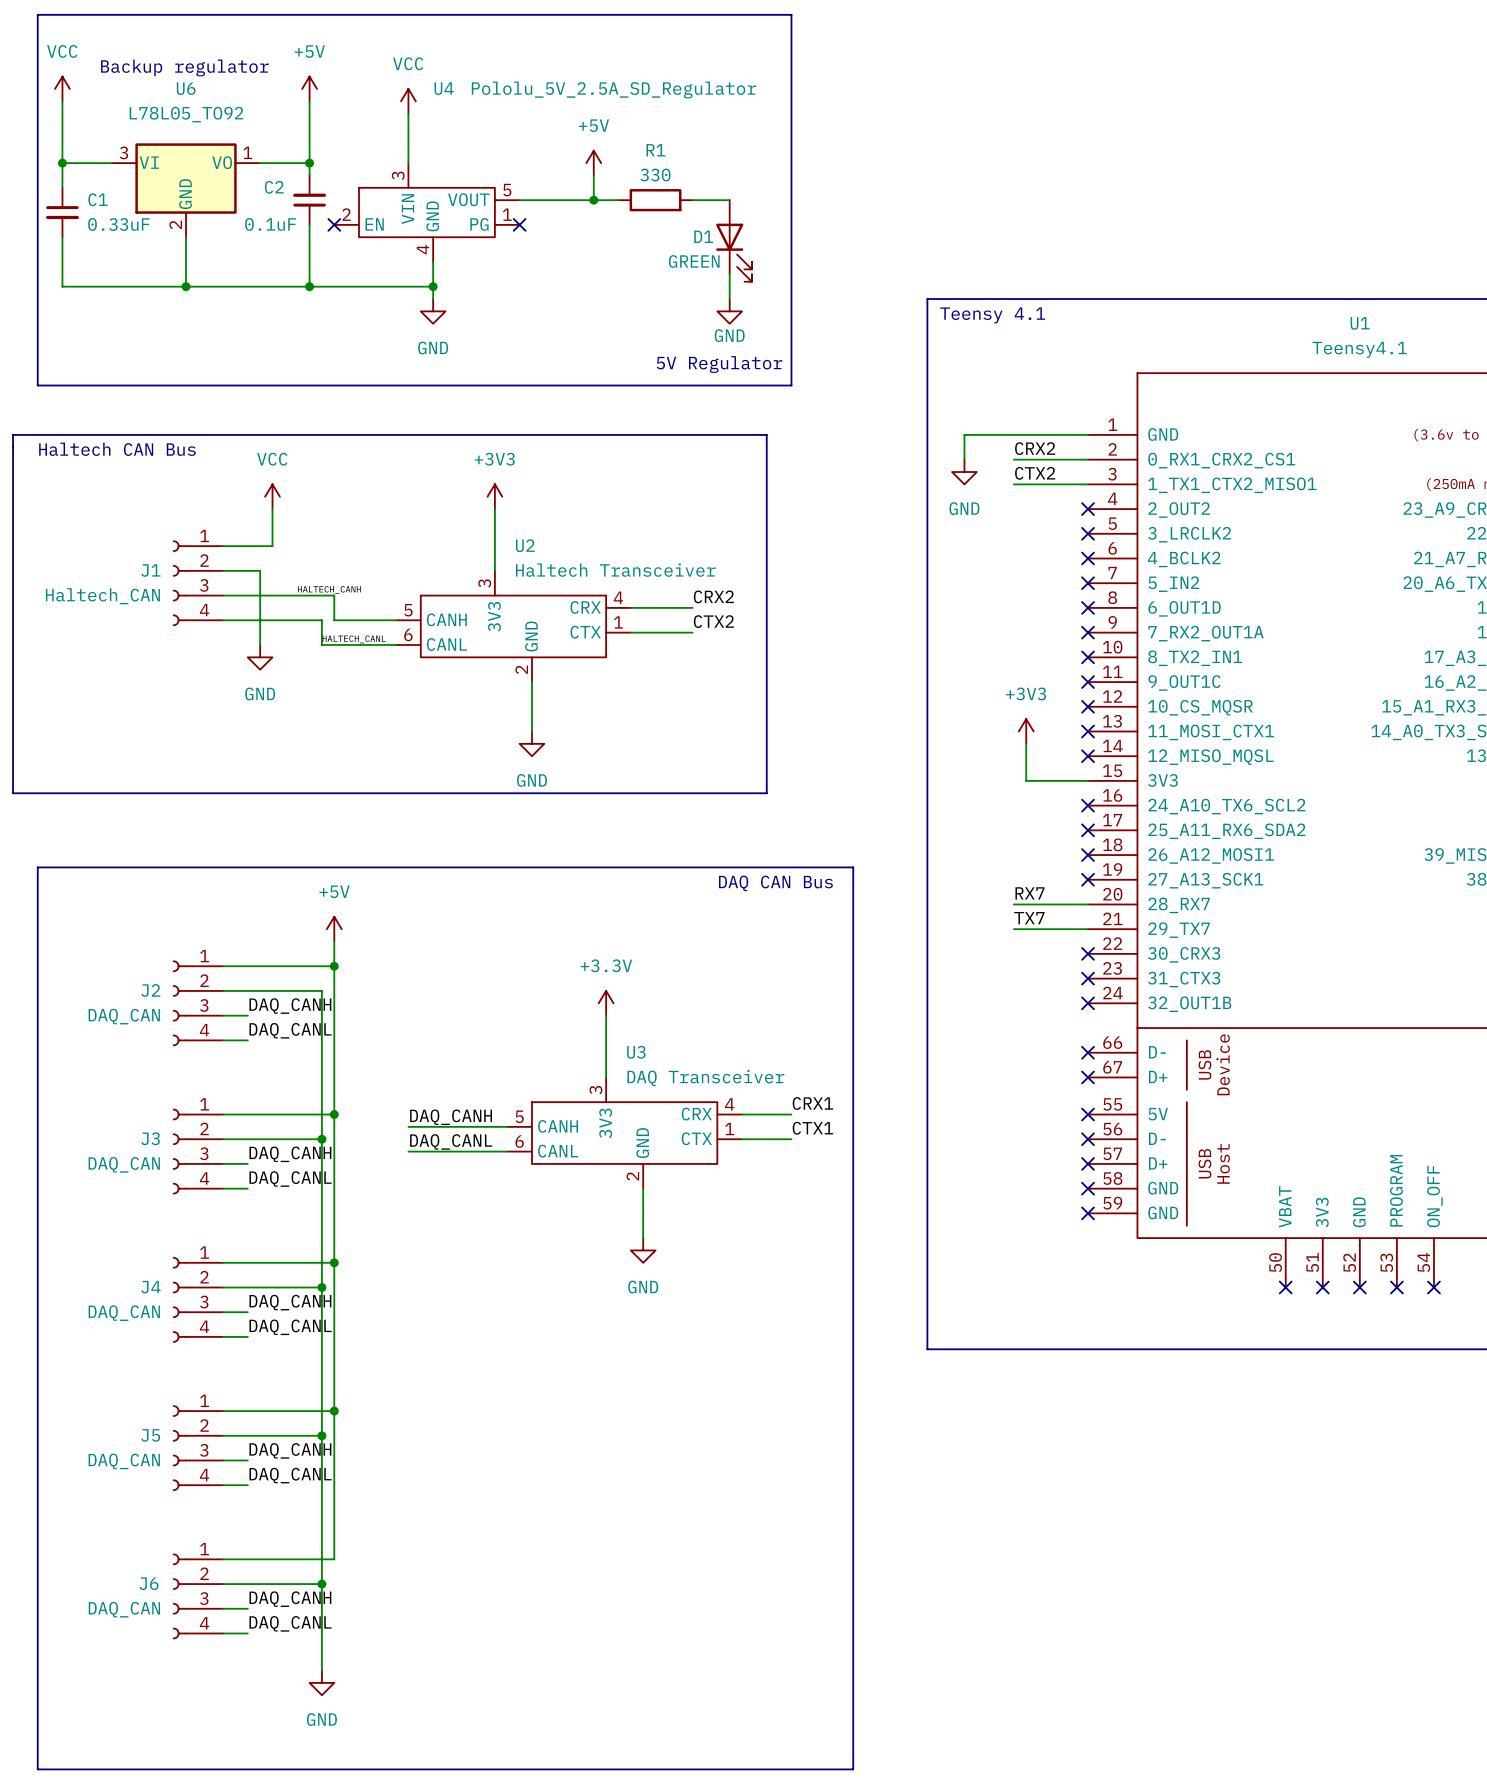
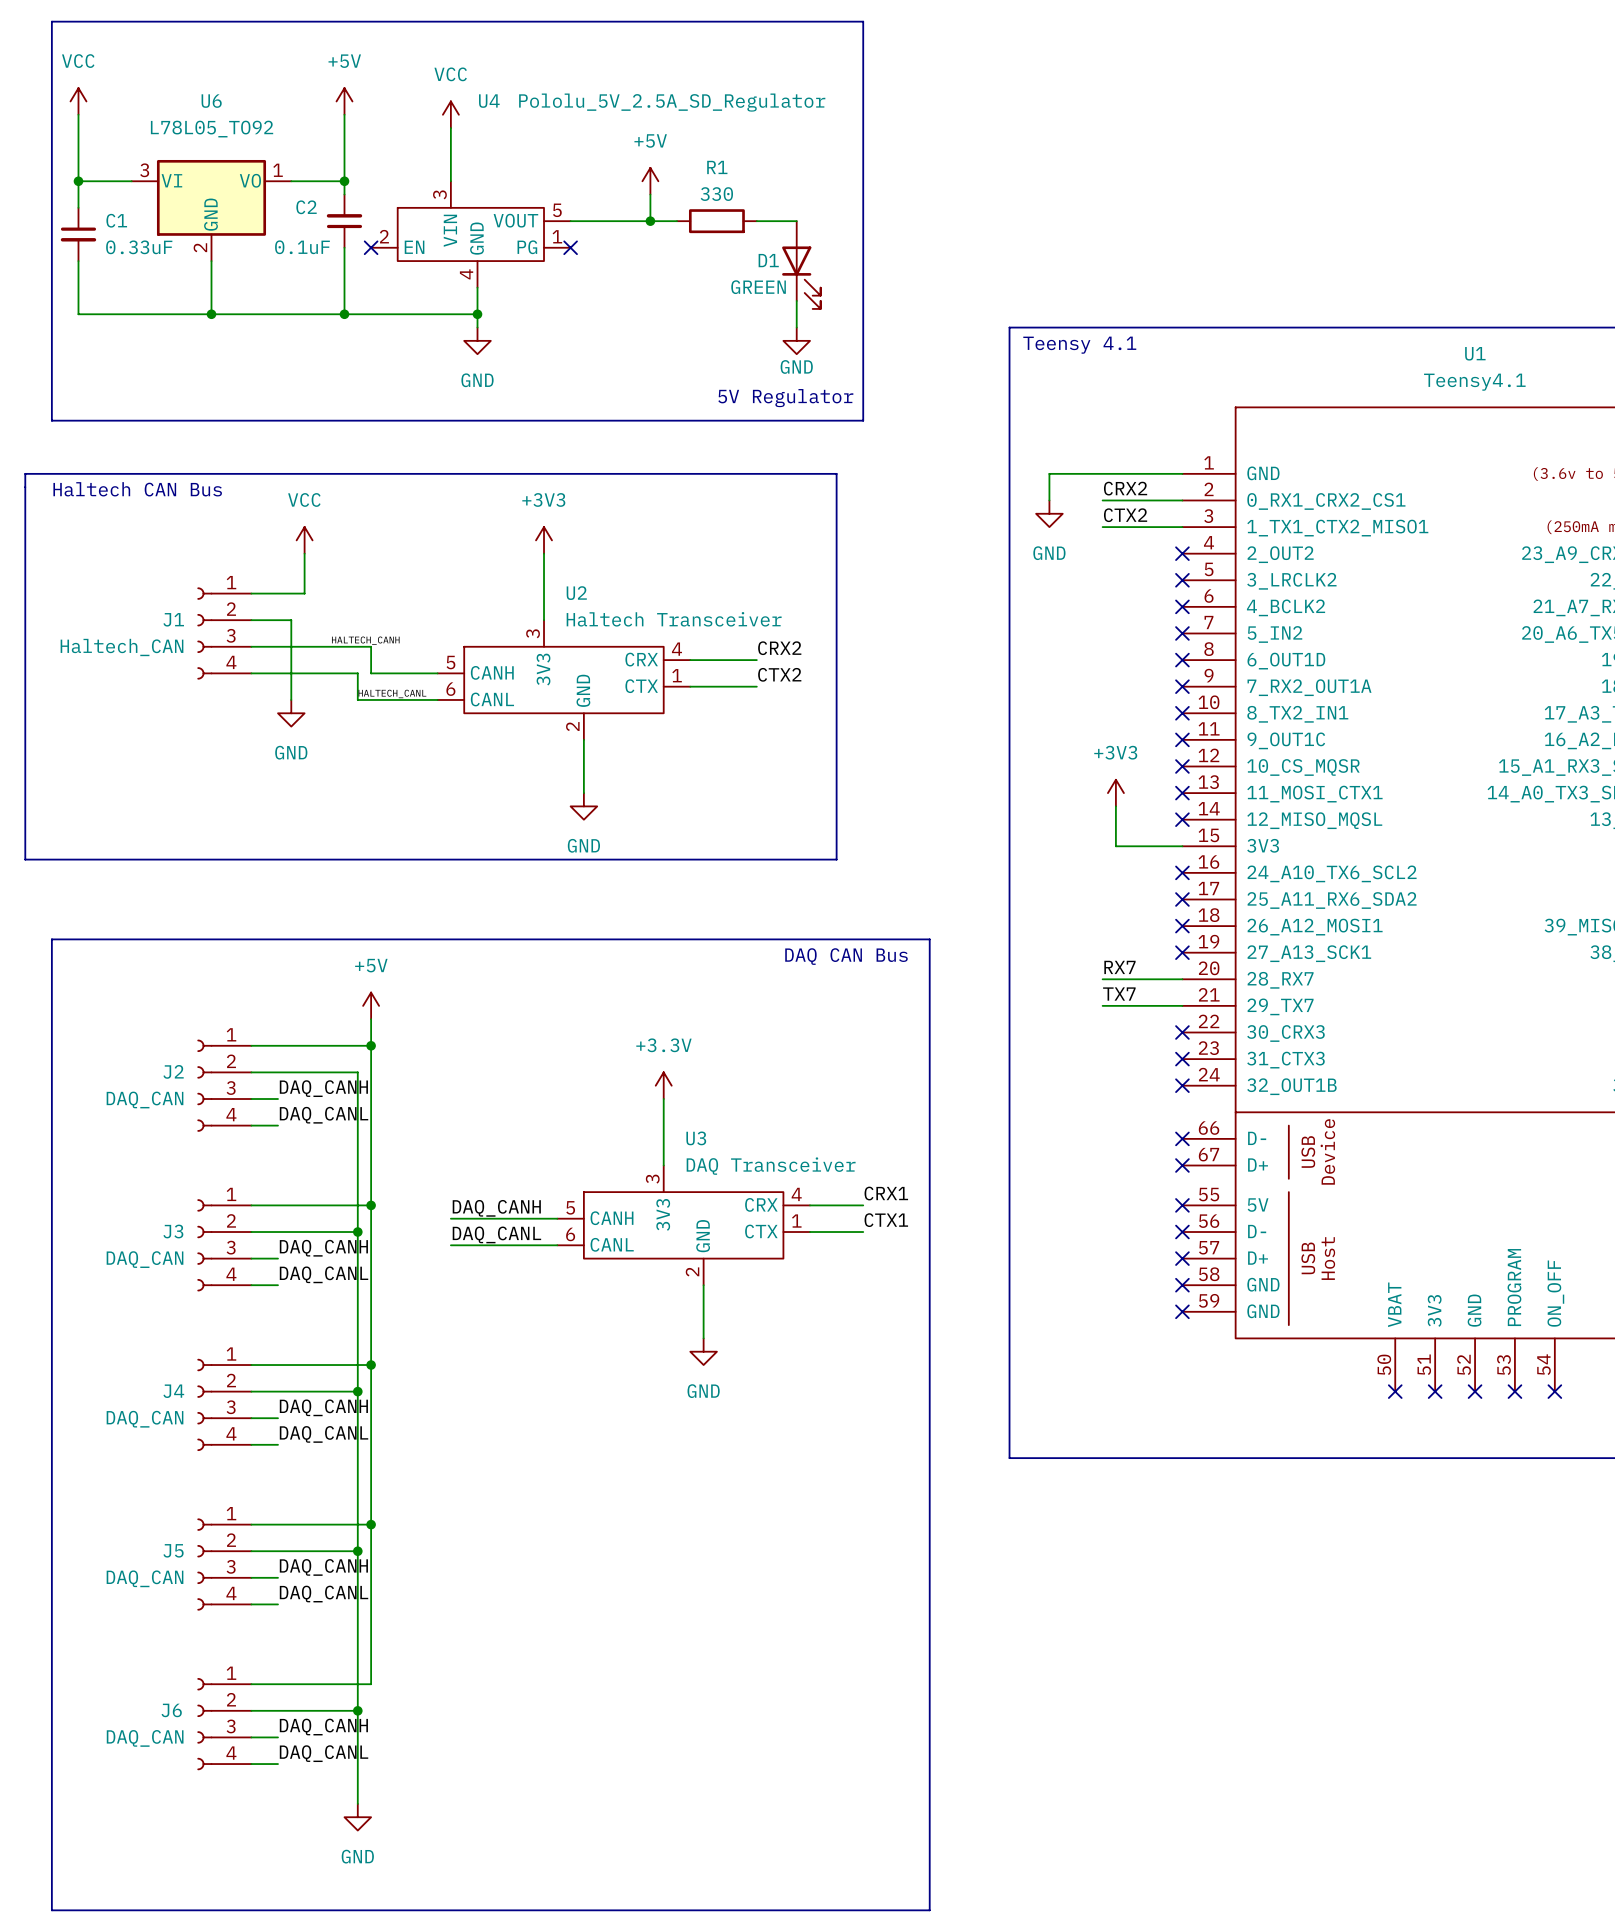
text: Backup regulator (184, 68) -> none

